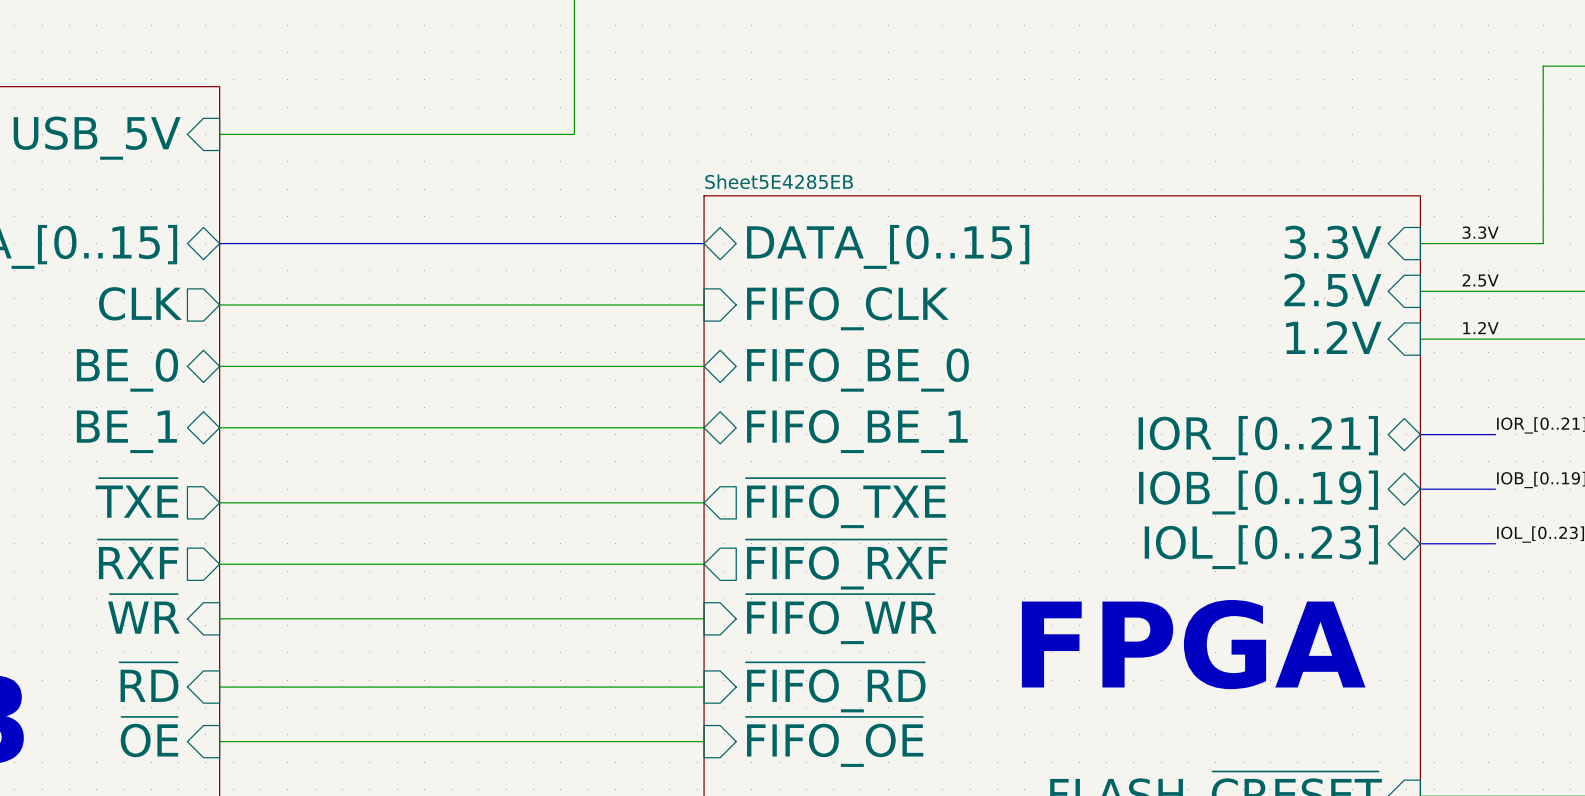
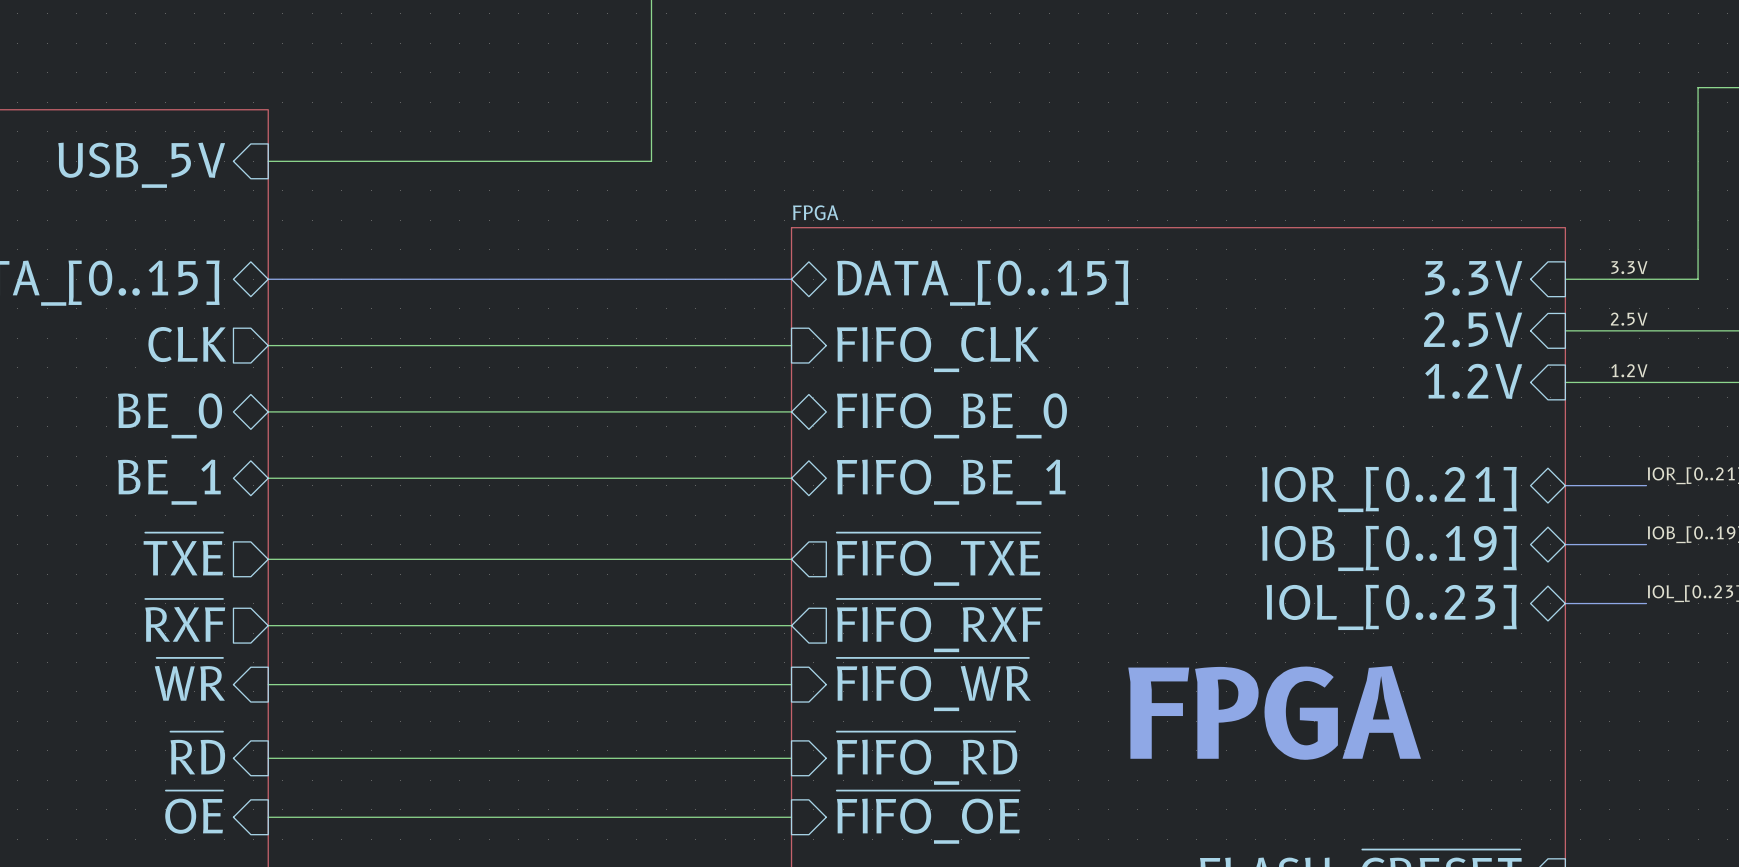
sheet Sheet5E4285EB name: Sheet5E4285EB (779, 181) -> FPGA (815, 212)

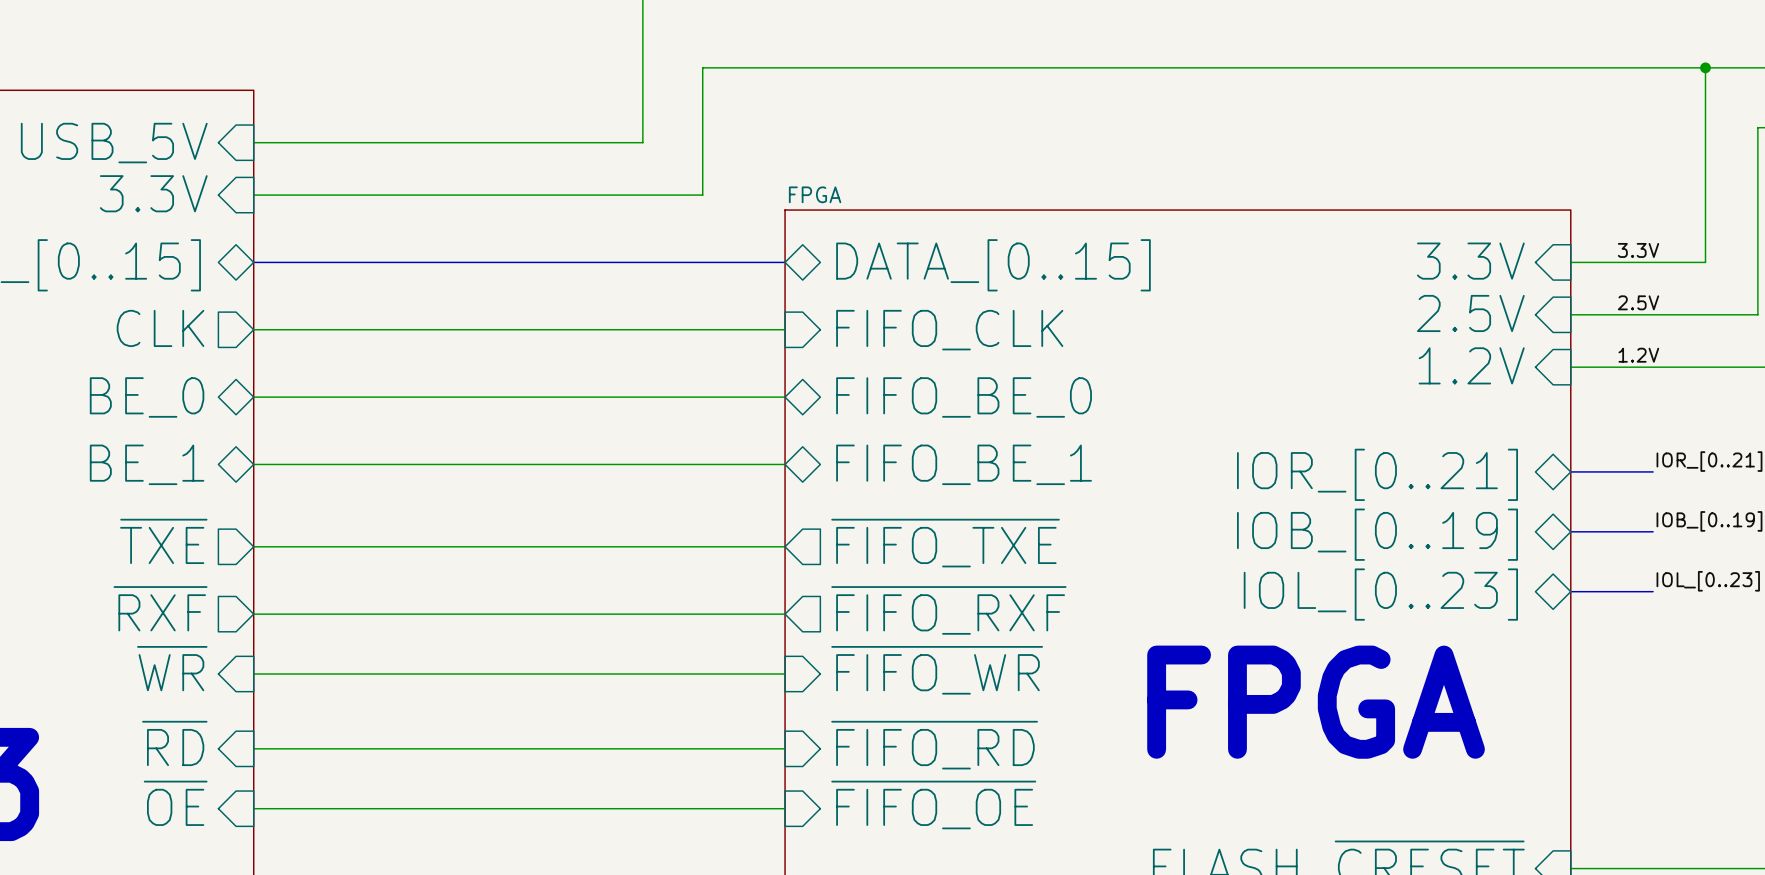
wire: none -> (1705, 67) (702, 67) (702, 195) (253, 195)
junction: none -> (1705, 67)
sheet pin: none -> 3.3V (153, 193)

